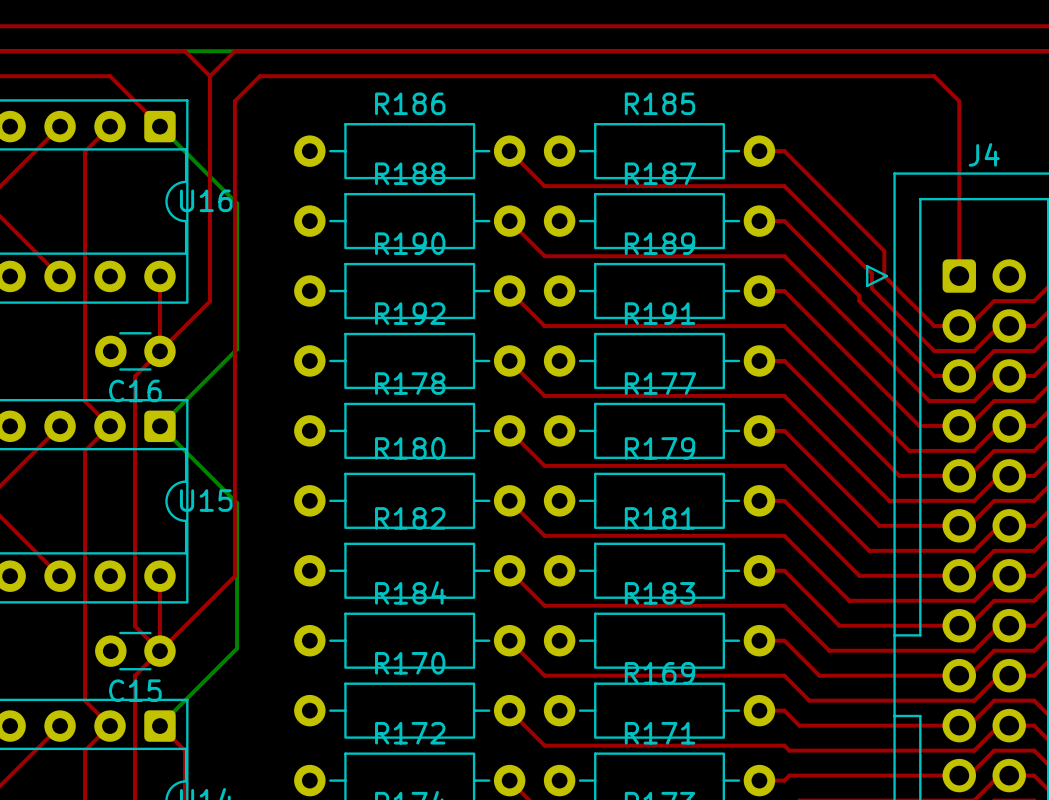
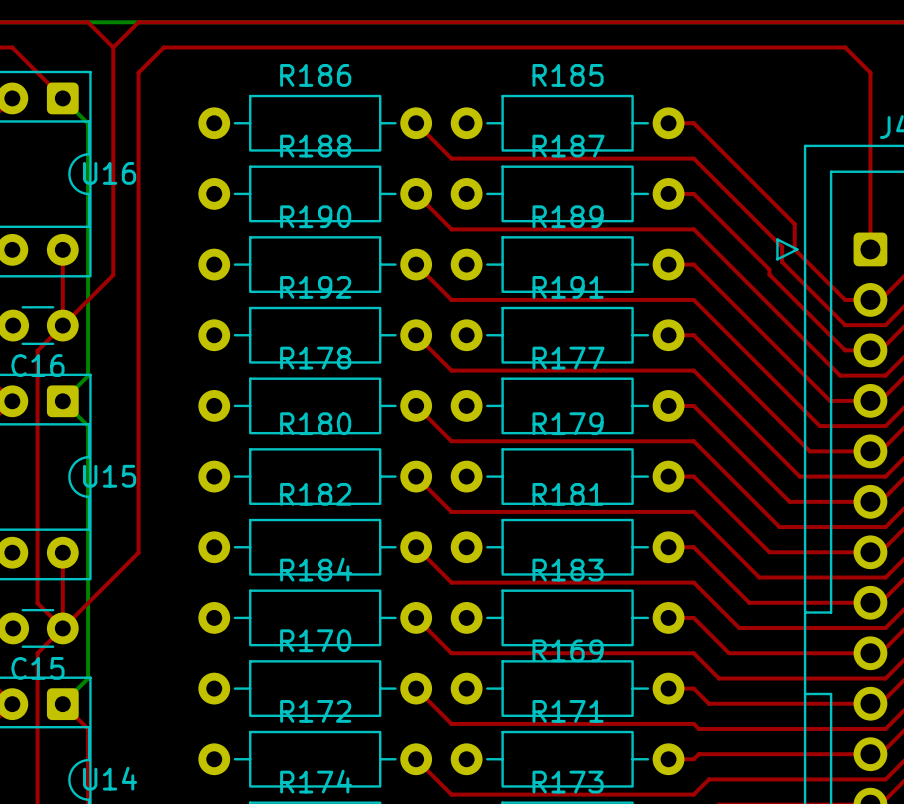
bottom track: (184, 151) (237, 203) (237, 349) (184, 401) -> (88, 123) (88, 376)
bottom track: (184, 450) (237, 503) (237, 648) (184, 700) -> (88, 426) (88, 678)

